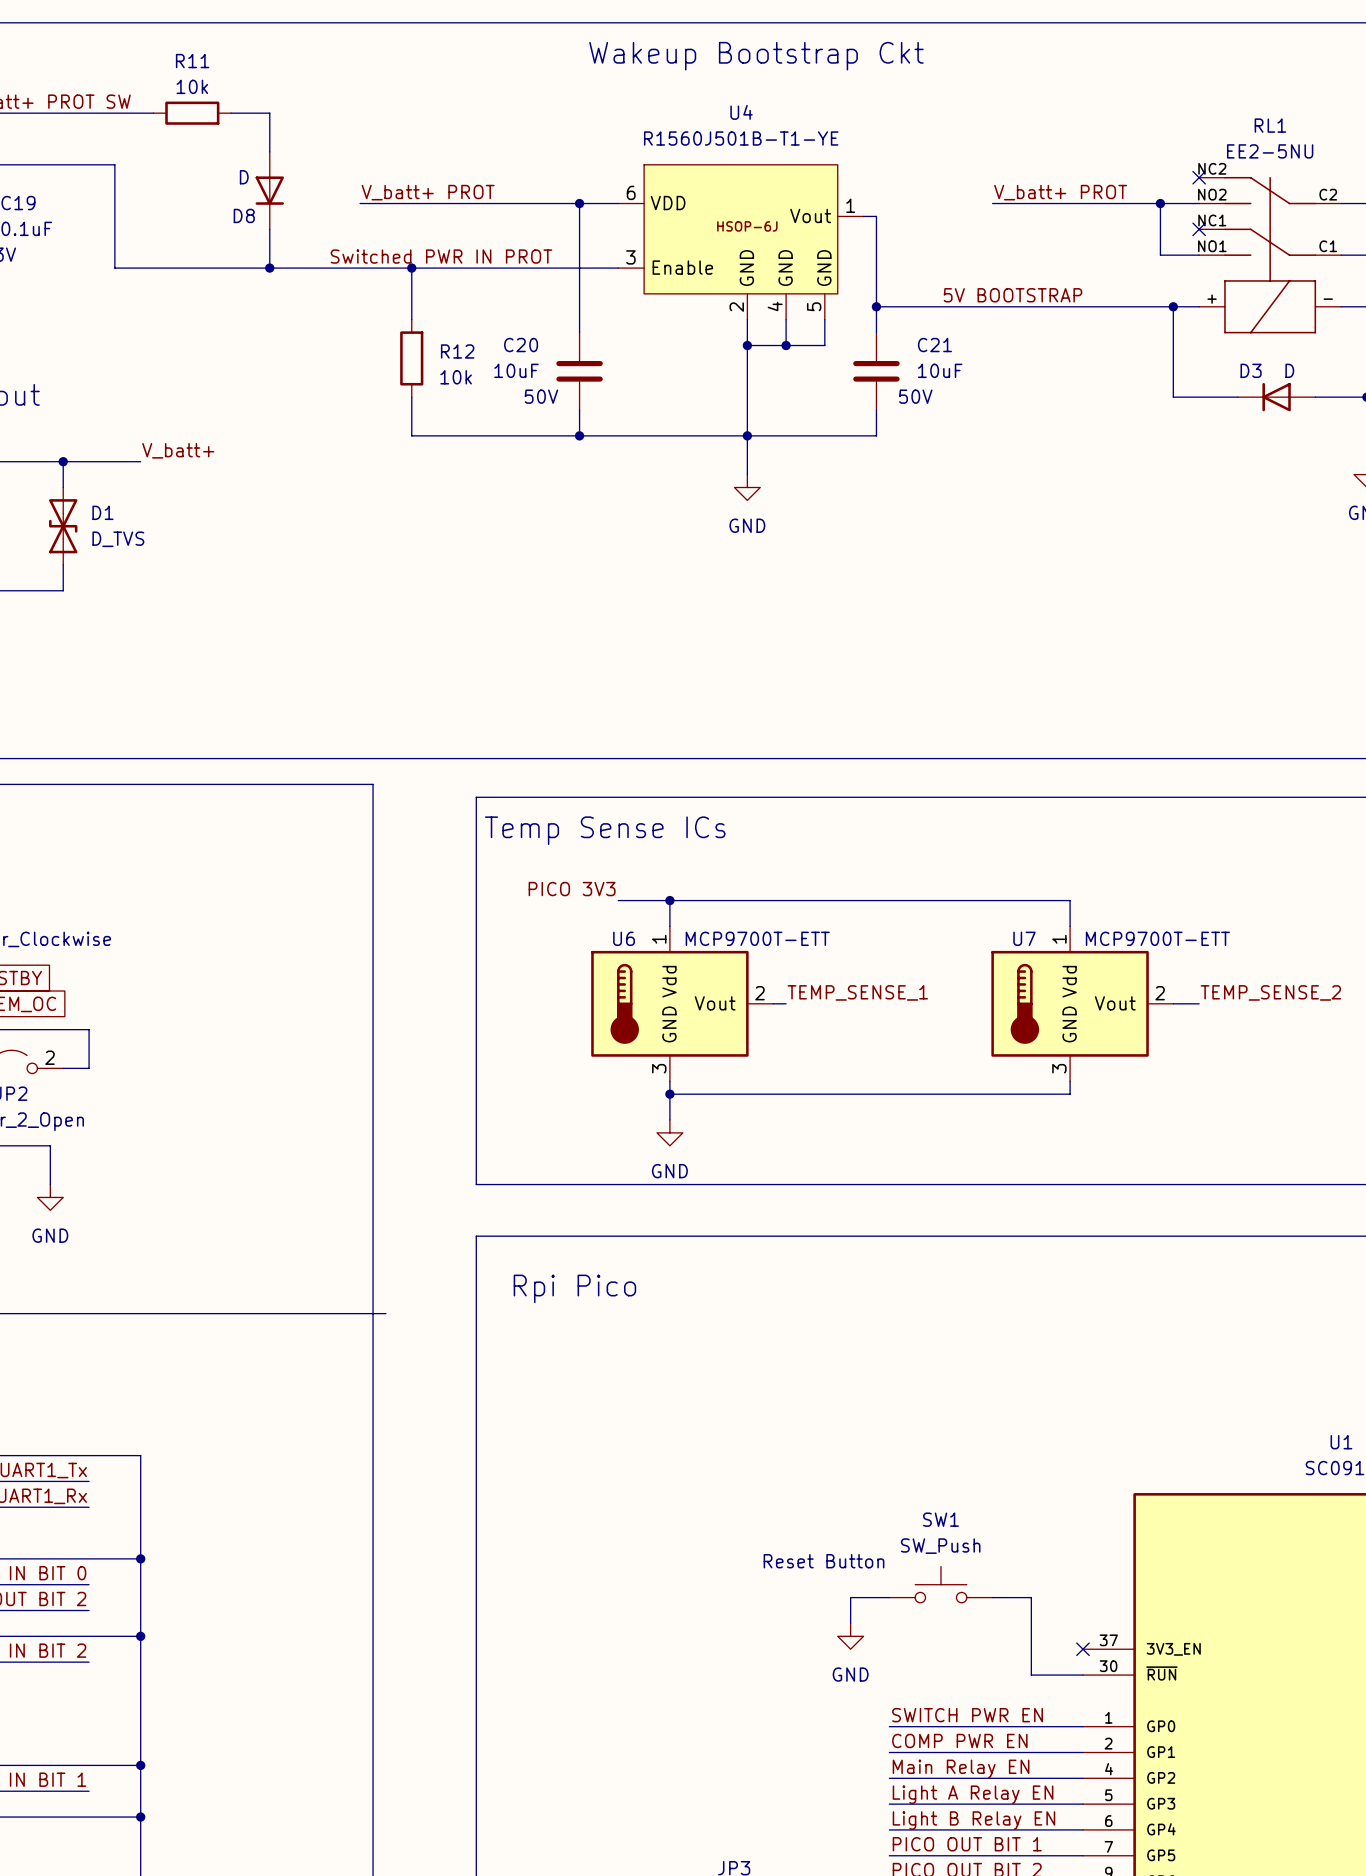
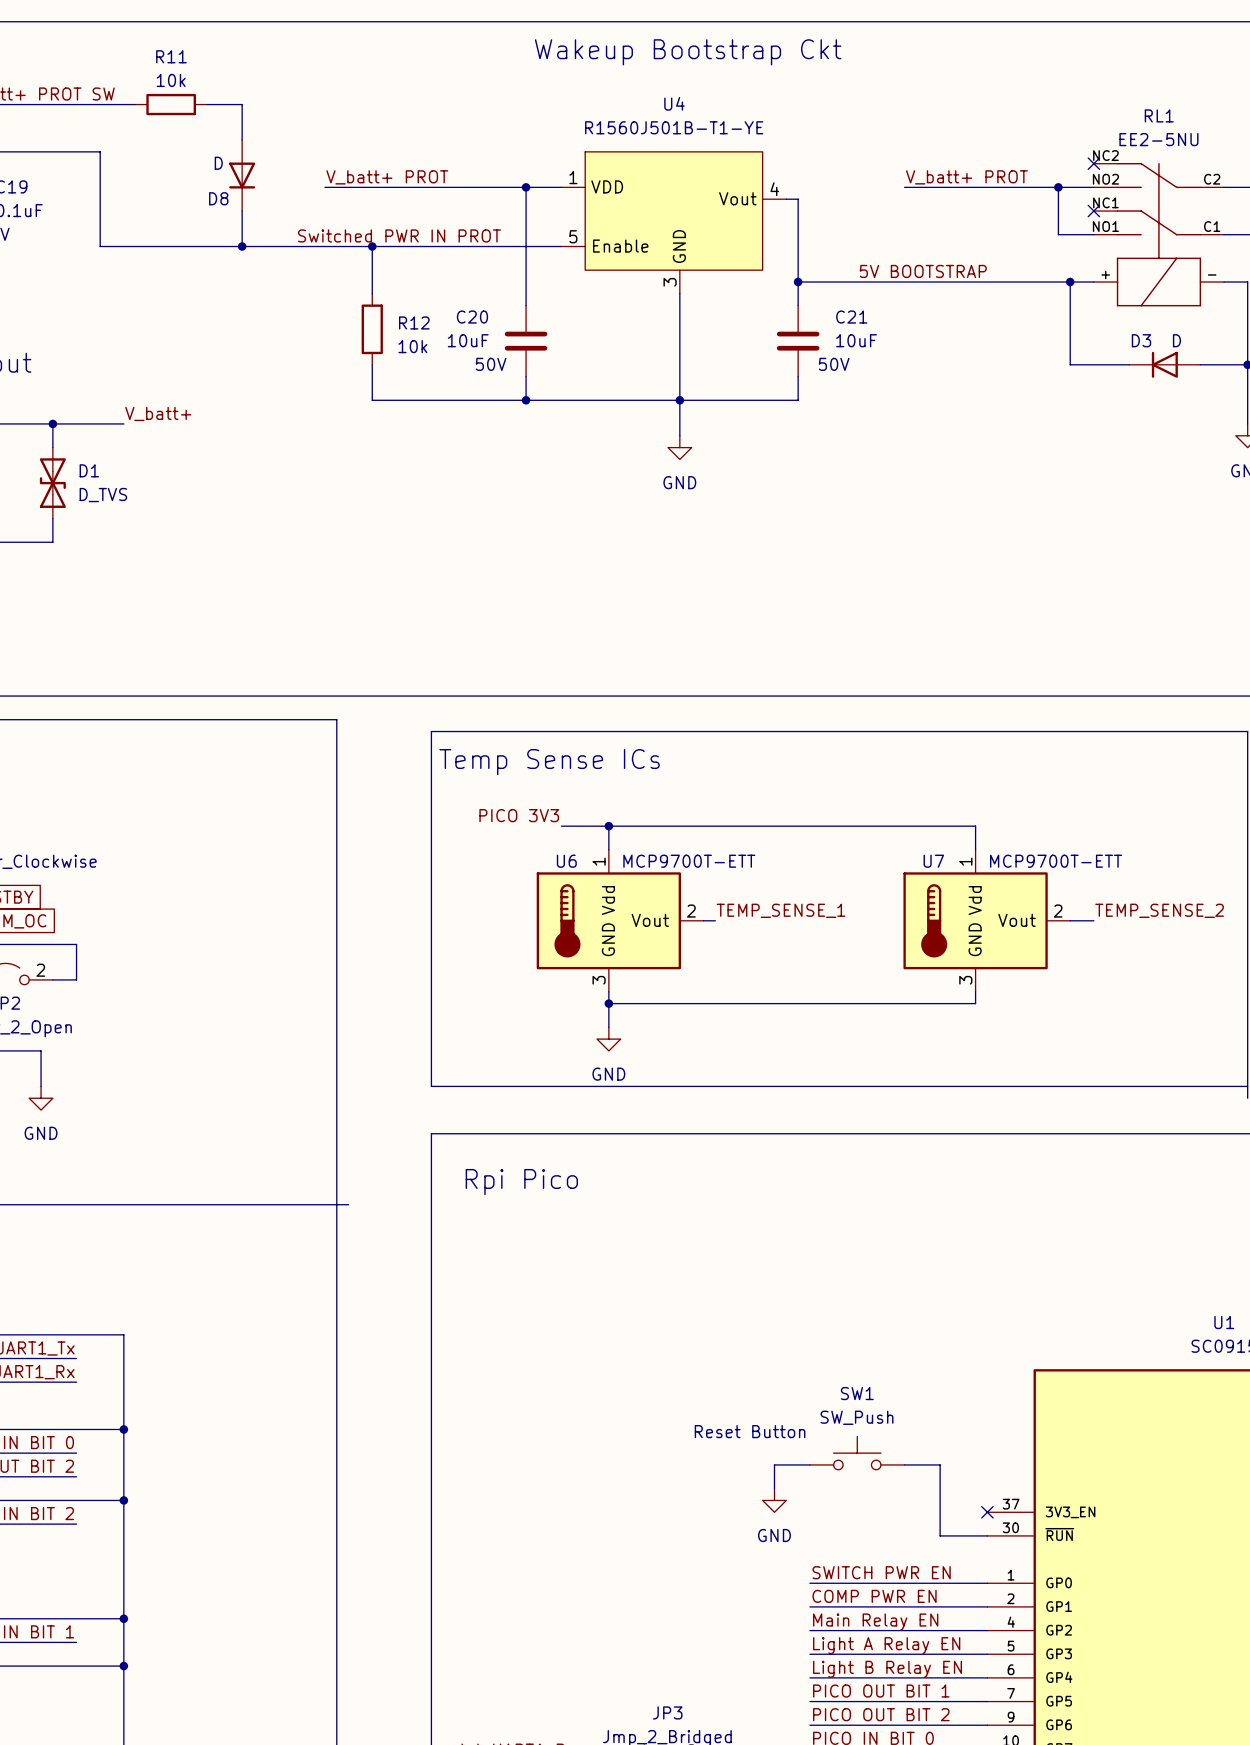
U4 symbol: [618, 164, 864, 320] -> [561, 151, 787, 294]
wire: (786, 319) (786, 345) -> none
wire: (824, 319) (824, 345) (747, 345) -> none
junction: (747, 345) -> none
junction: (786, 345) -> none

